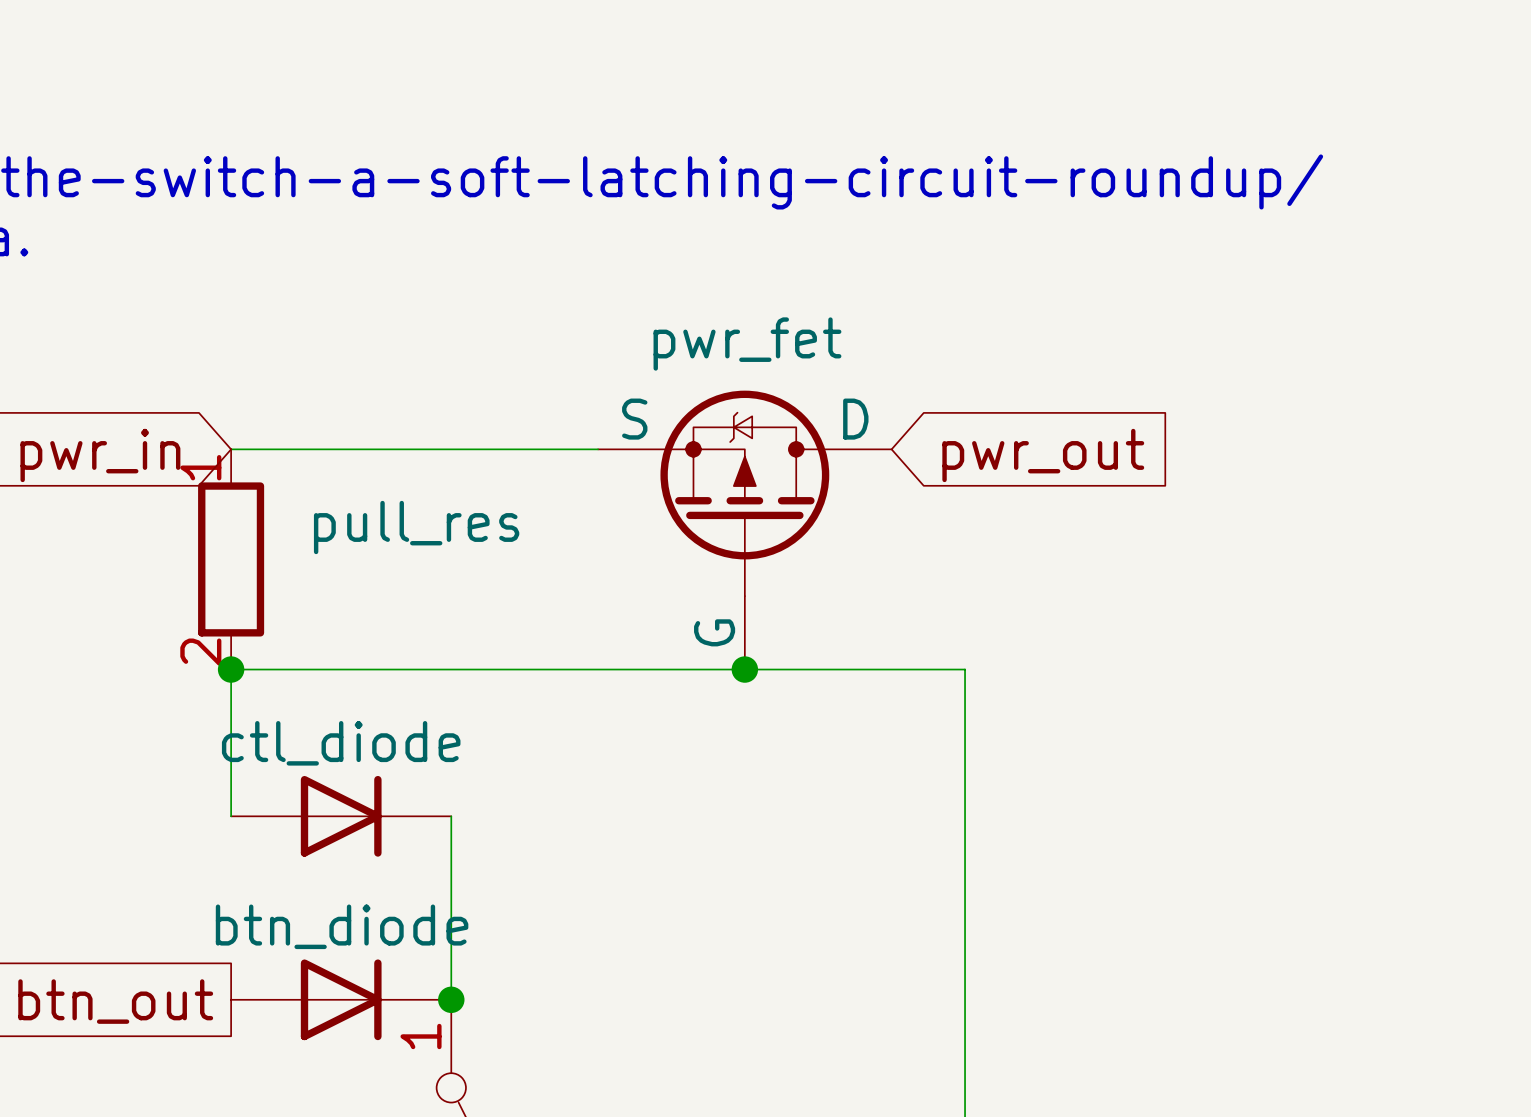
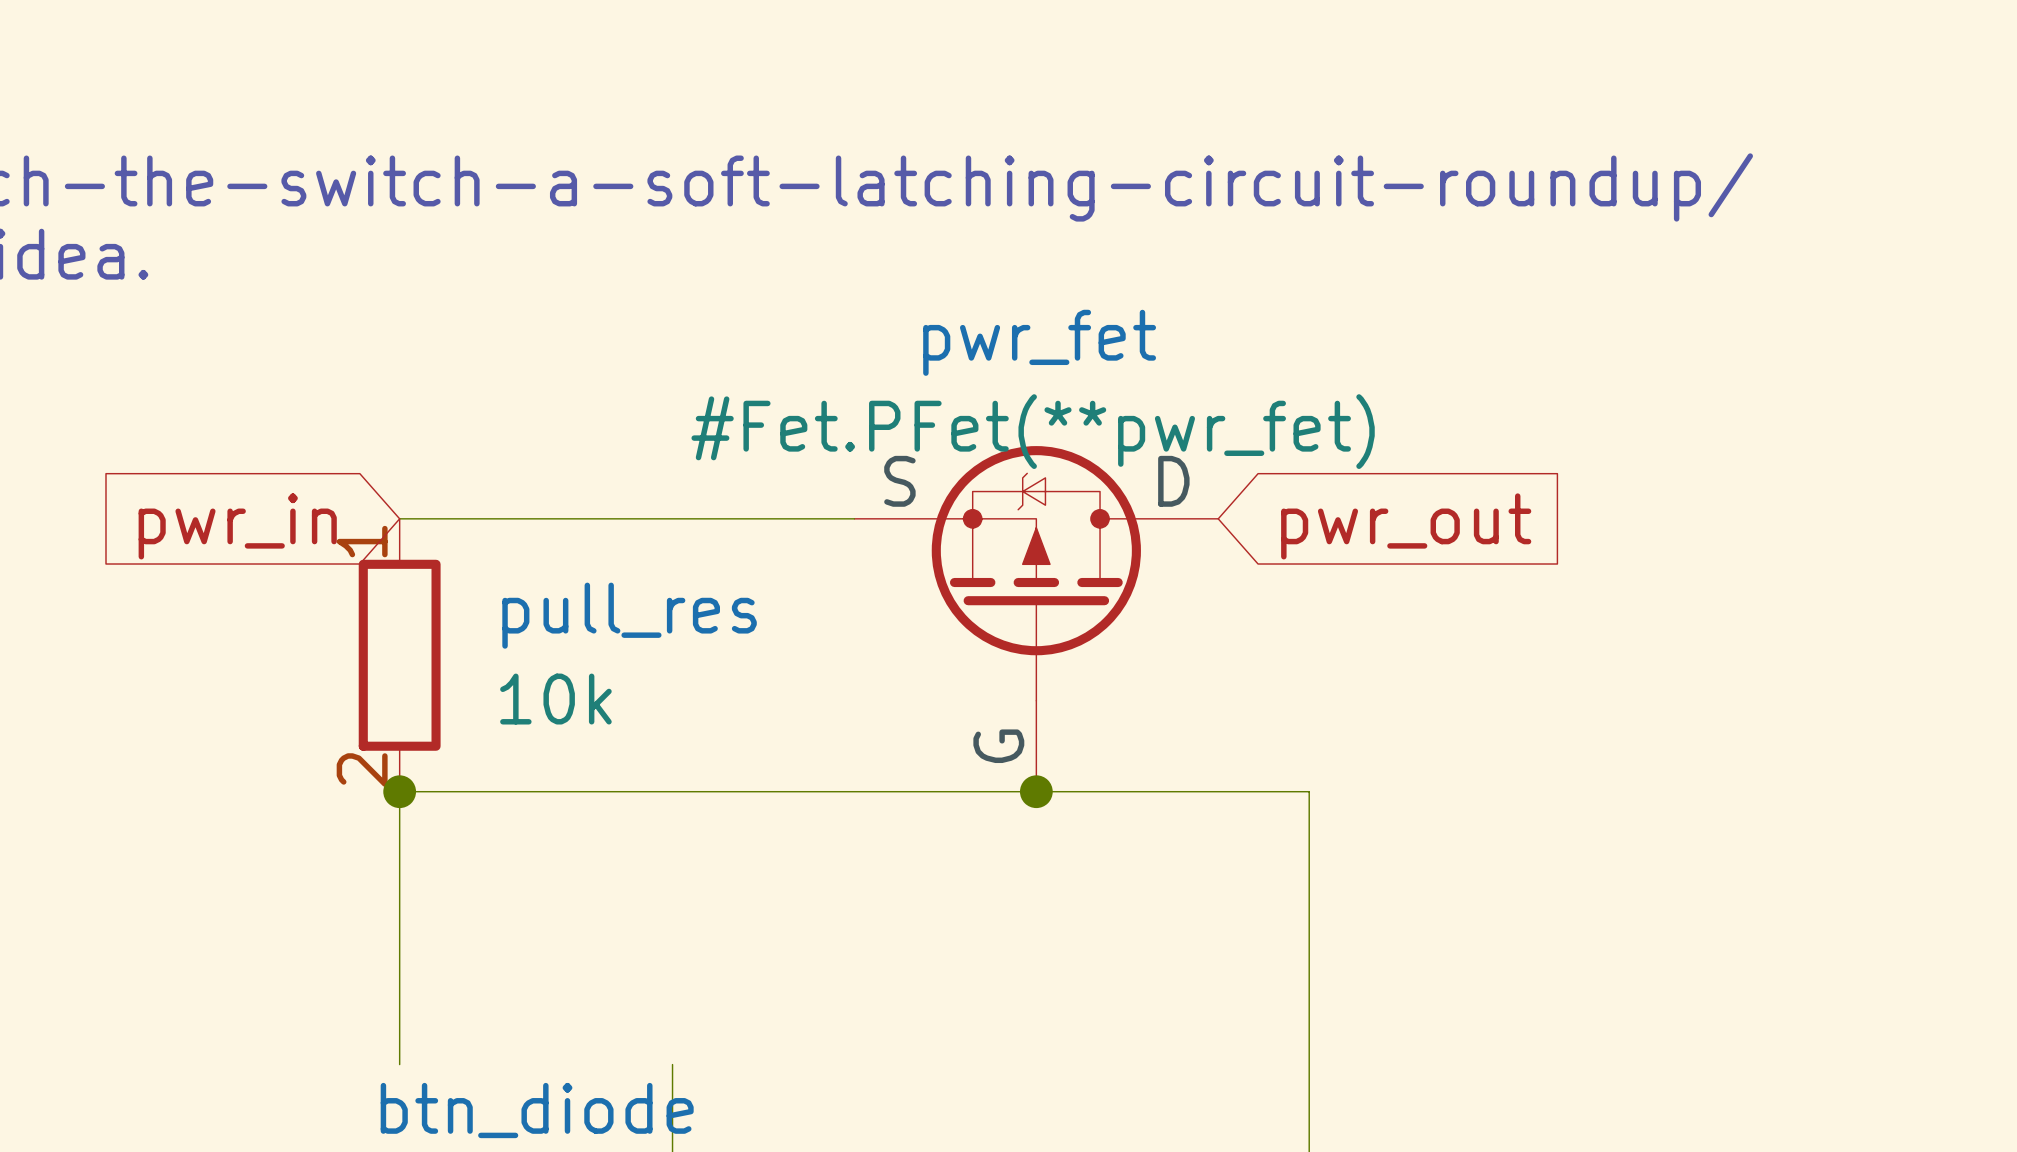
pwr_fet name position: pwr_fet (747, 344) -> pwr_fet (1039, 342)
pwr_fet value: none -> #Fet.PFet(**pwr_fet) (1033, 431)
pull_res value: none -> 10k (555, 699)
ctl_diode: (341, 816) -> none
wire: (451, 816) (451, 889) -> (399, 973) (399, 1064)

